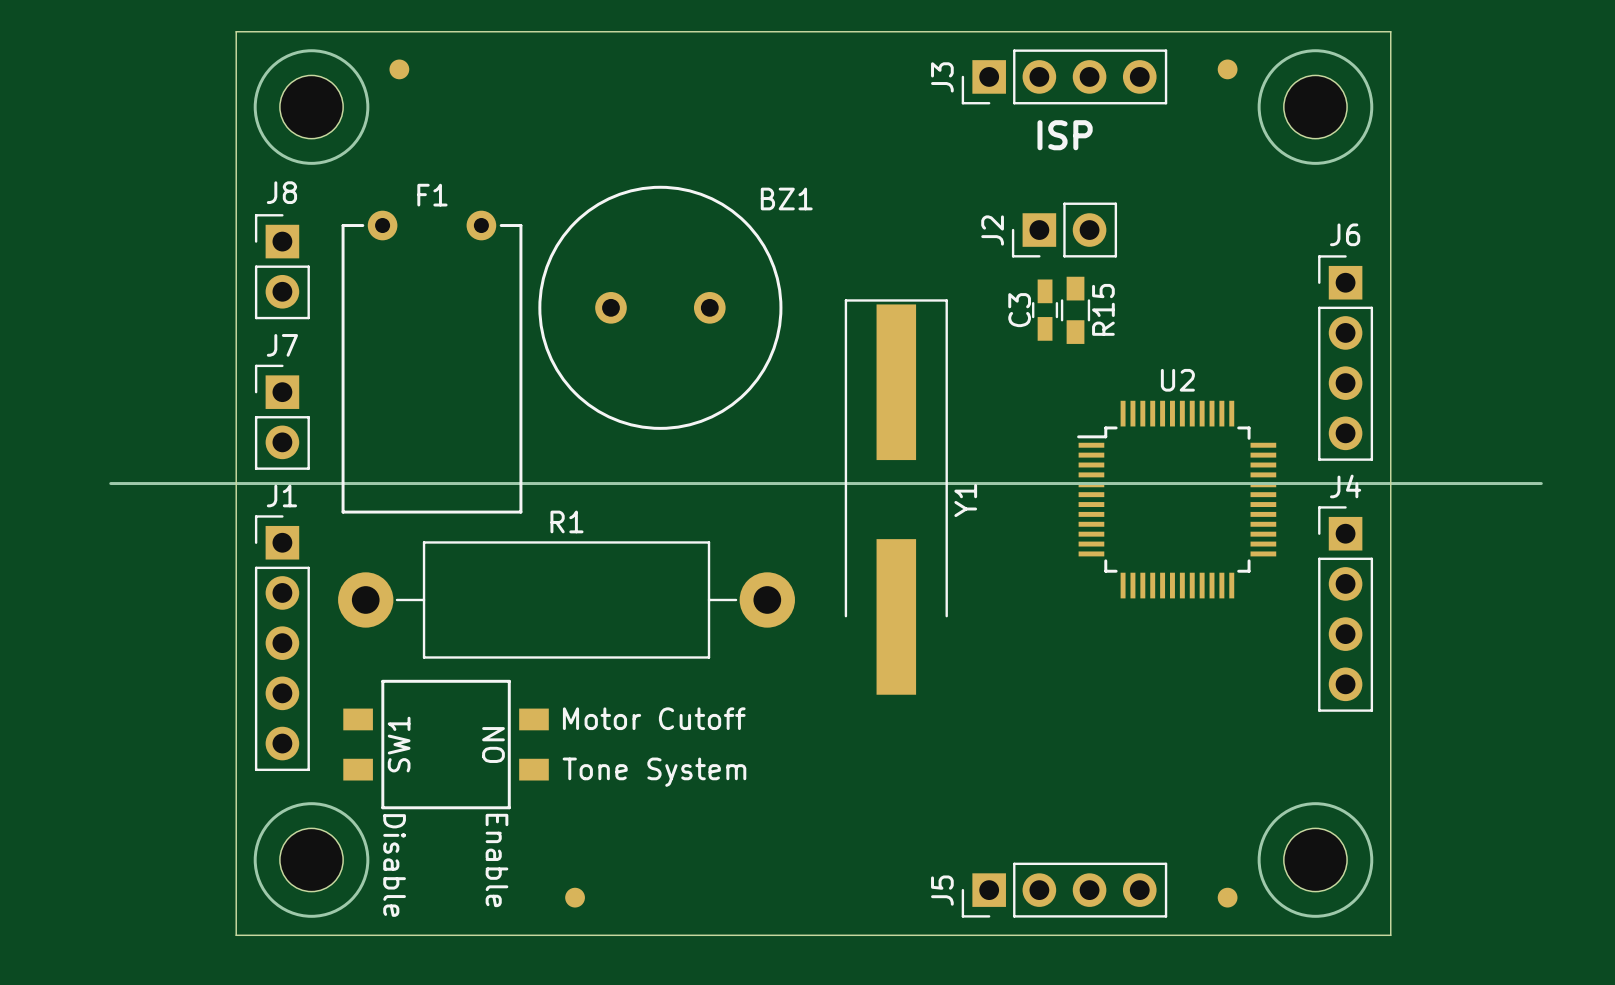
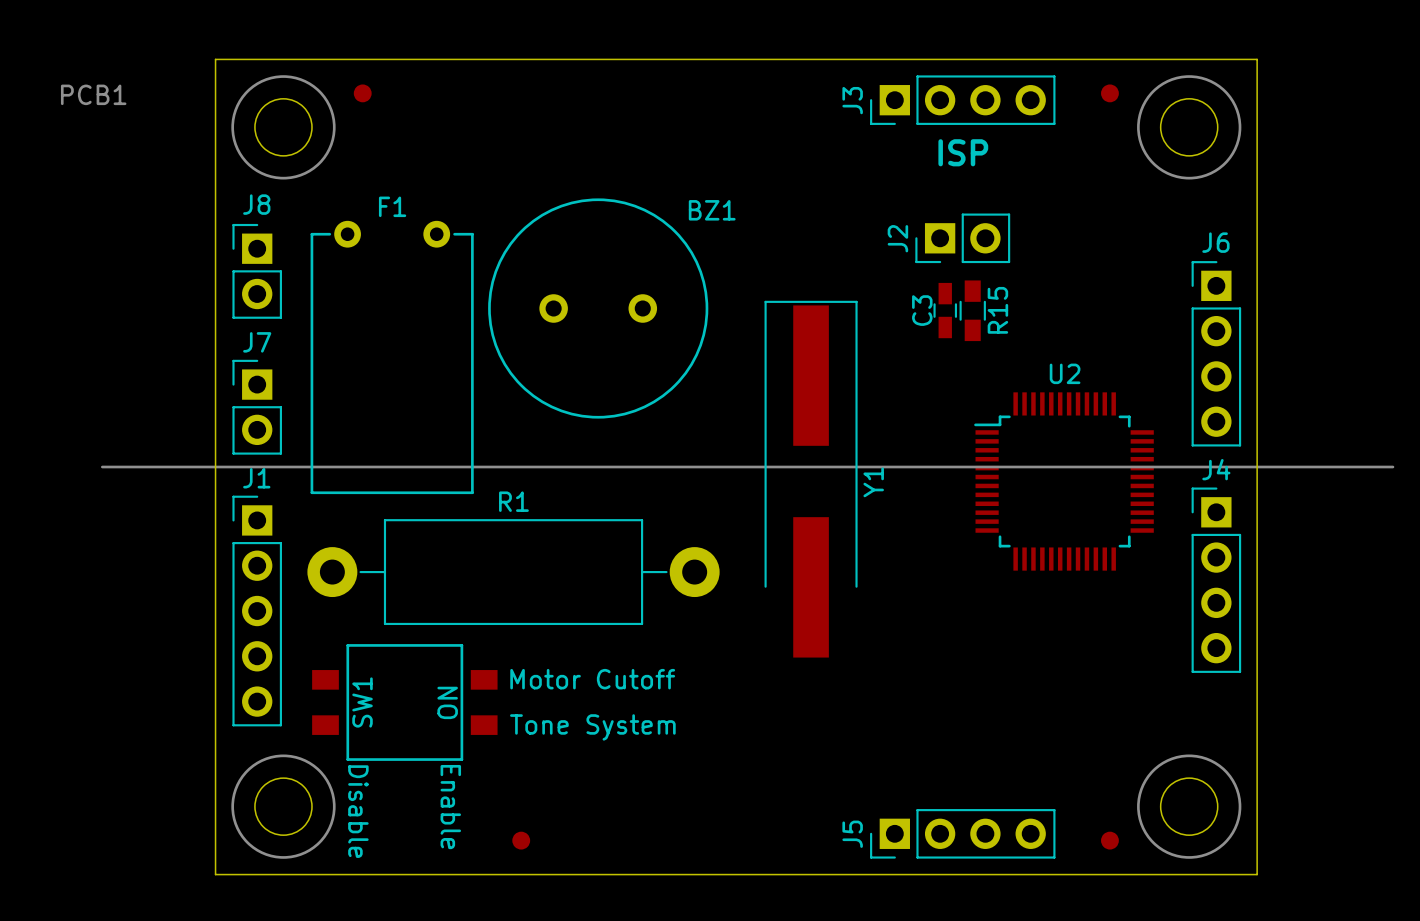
PCB1: none -> (93, 94)

